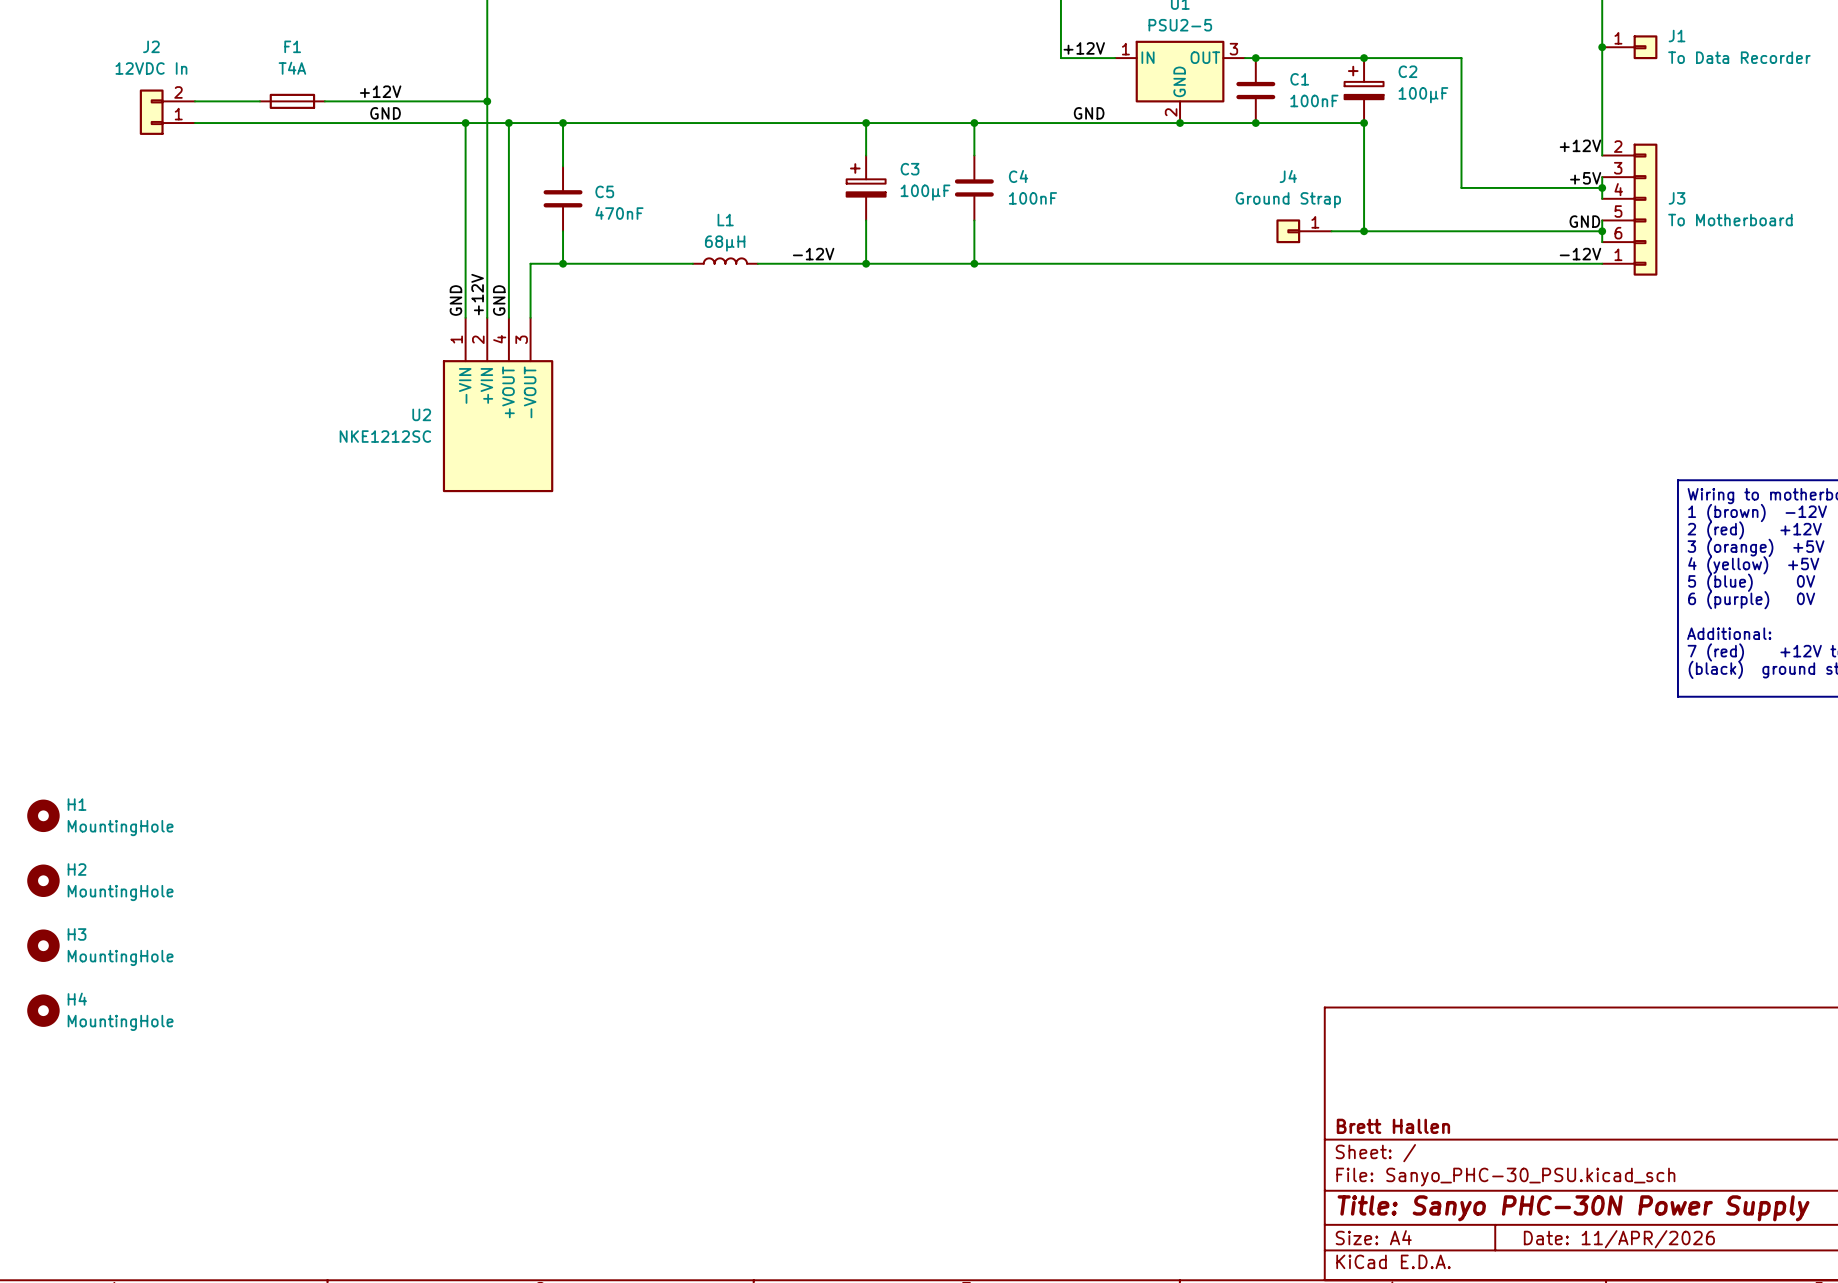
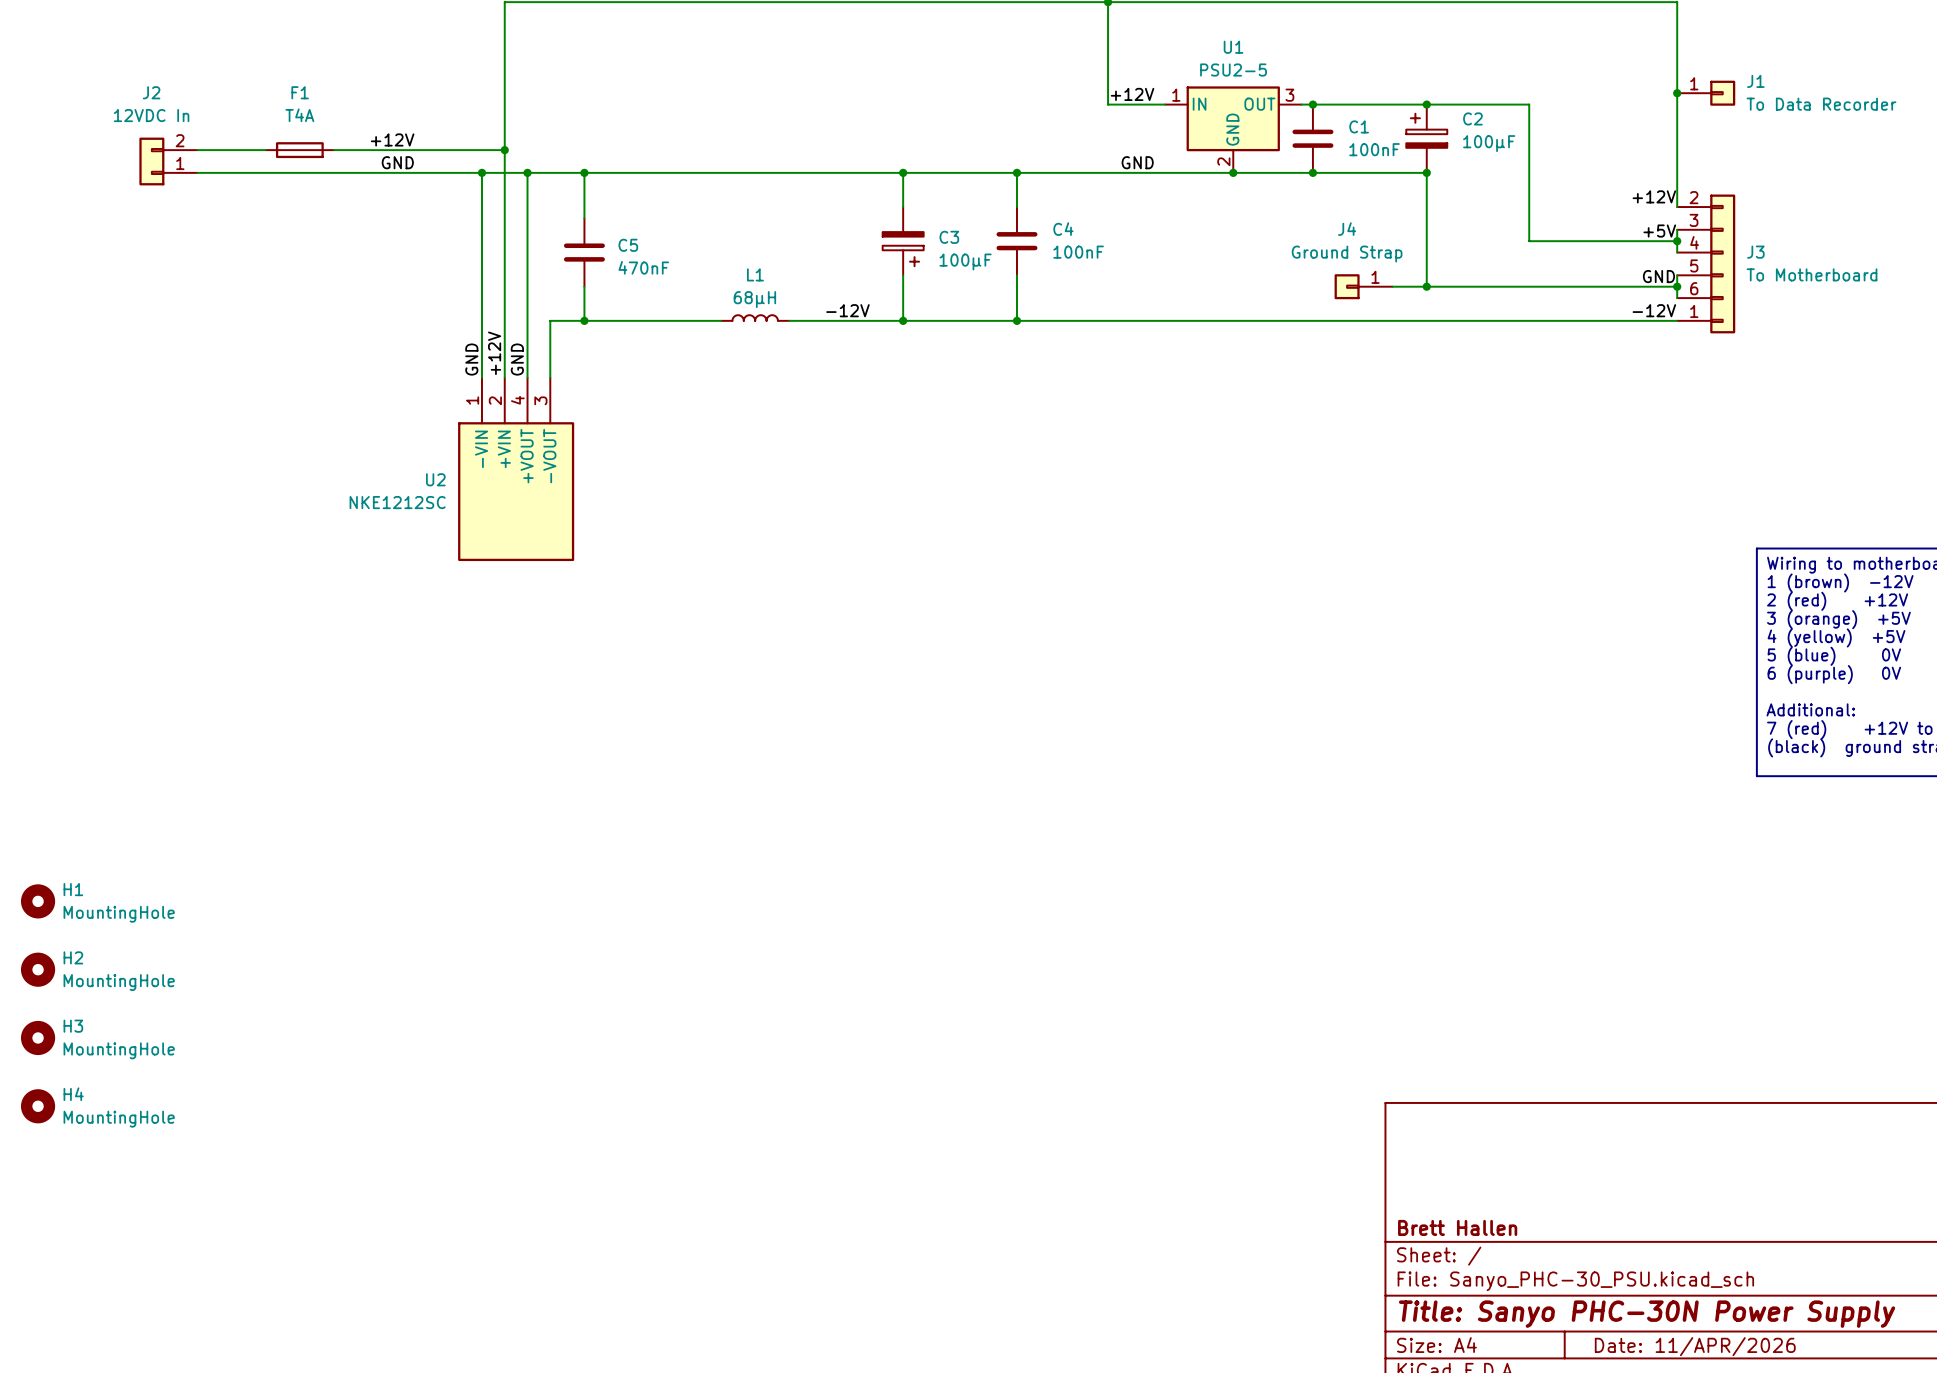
C3 rotation: 0° (866, 180) -> 180° (903, 249)

